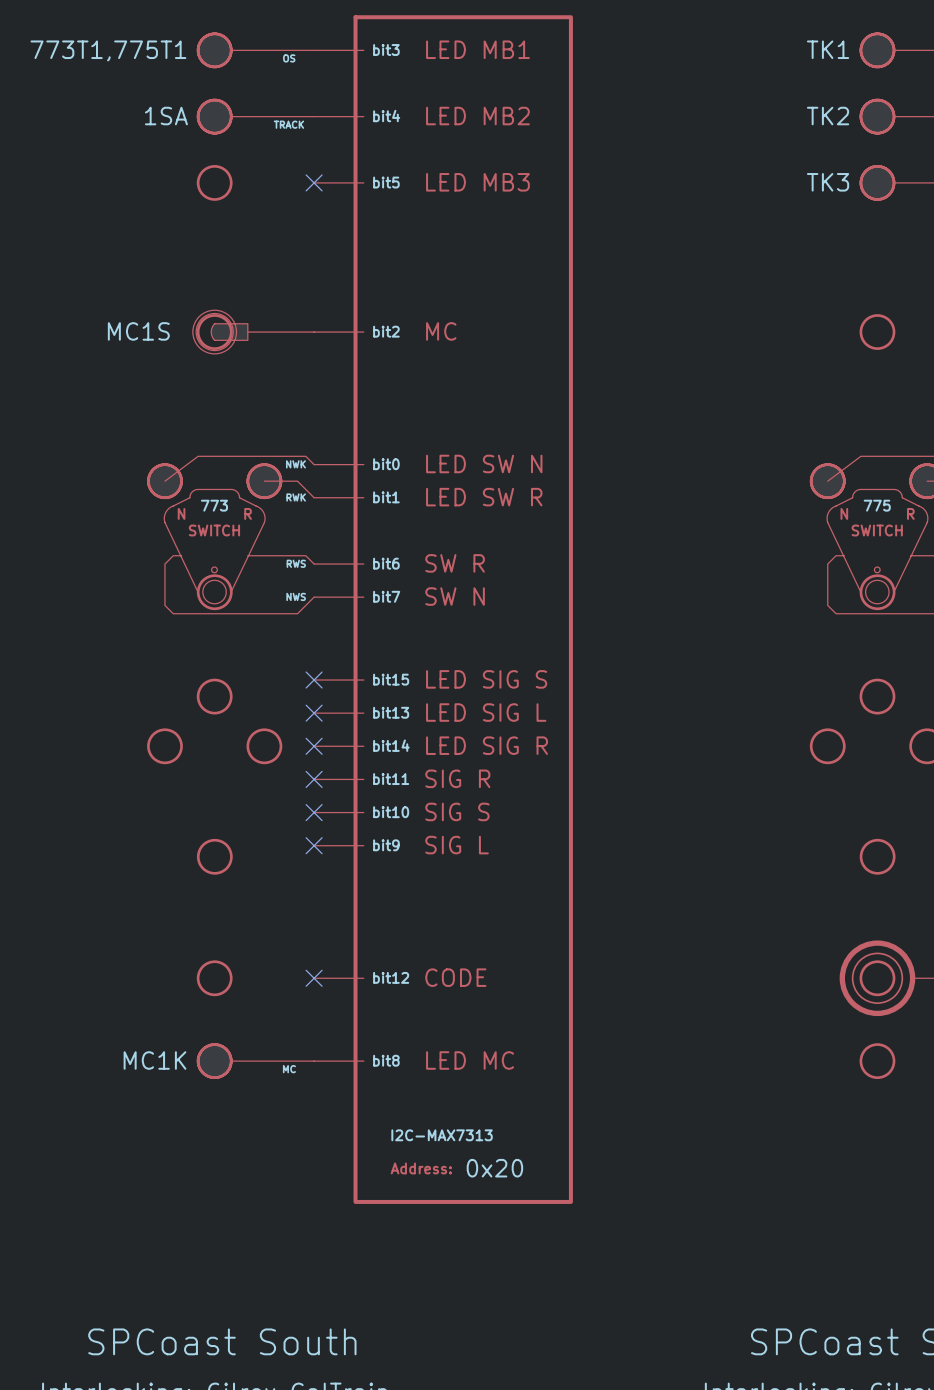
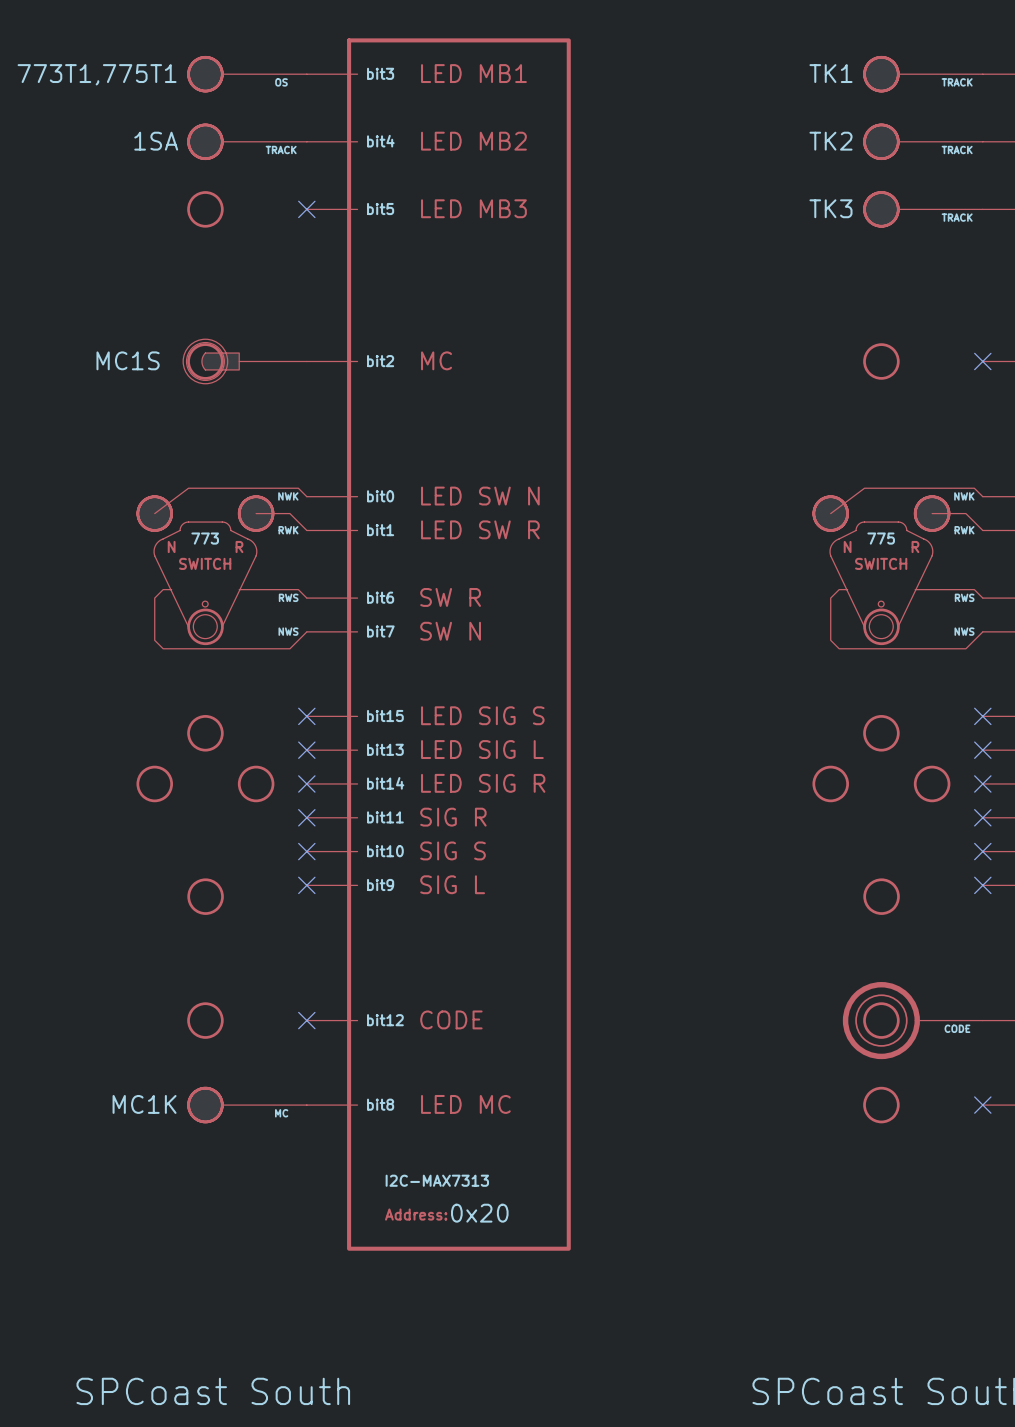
part text: none -> 0x20 (479, 1213)
part value: 0x20 (494, 1168) -> none

